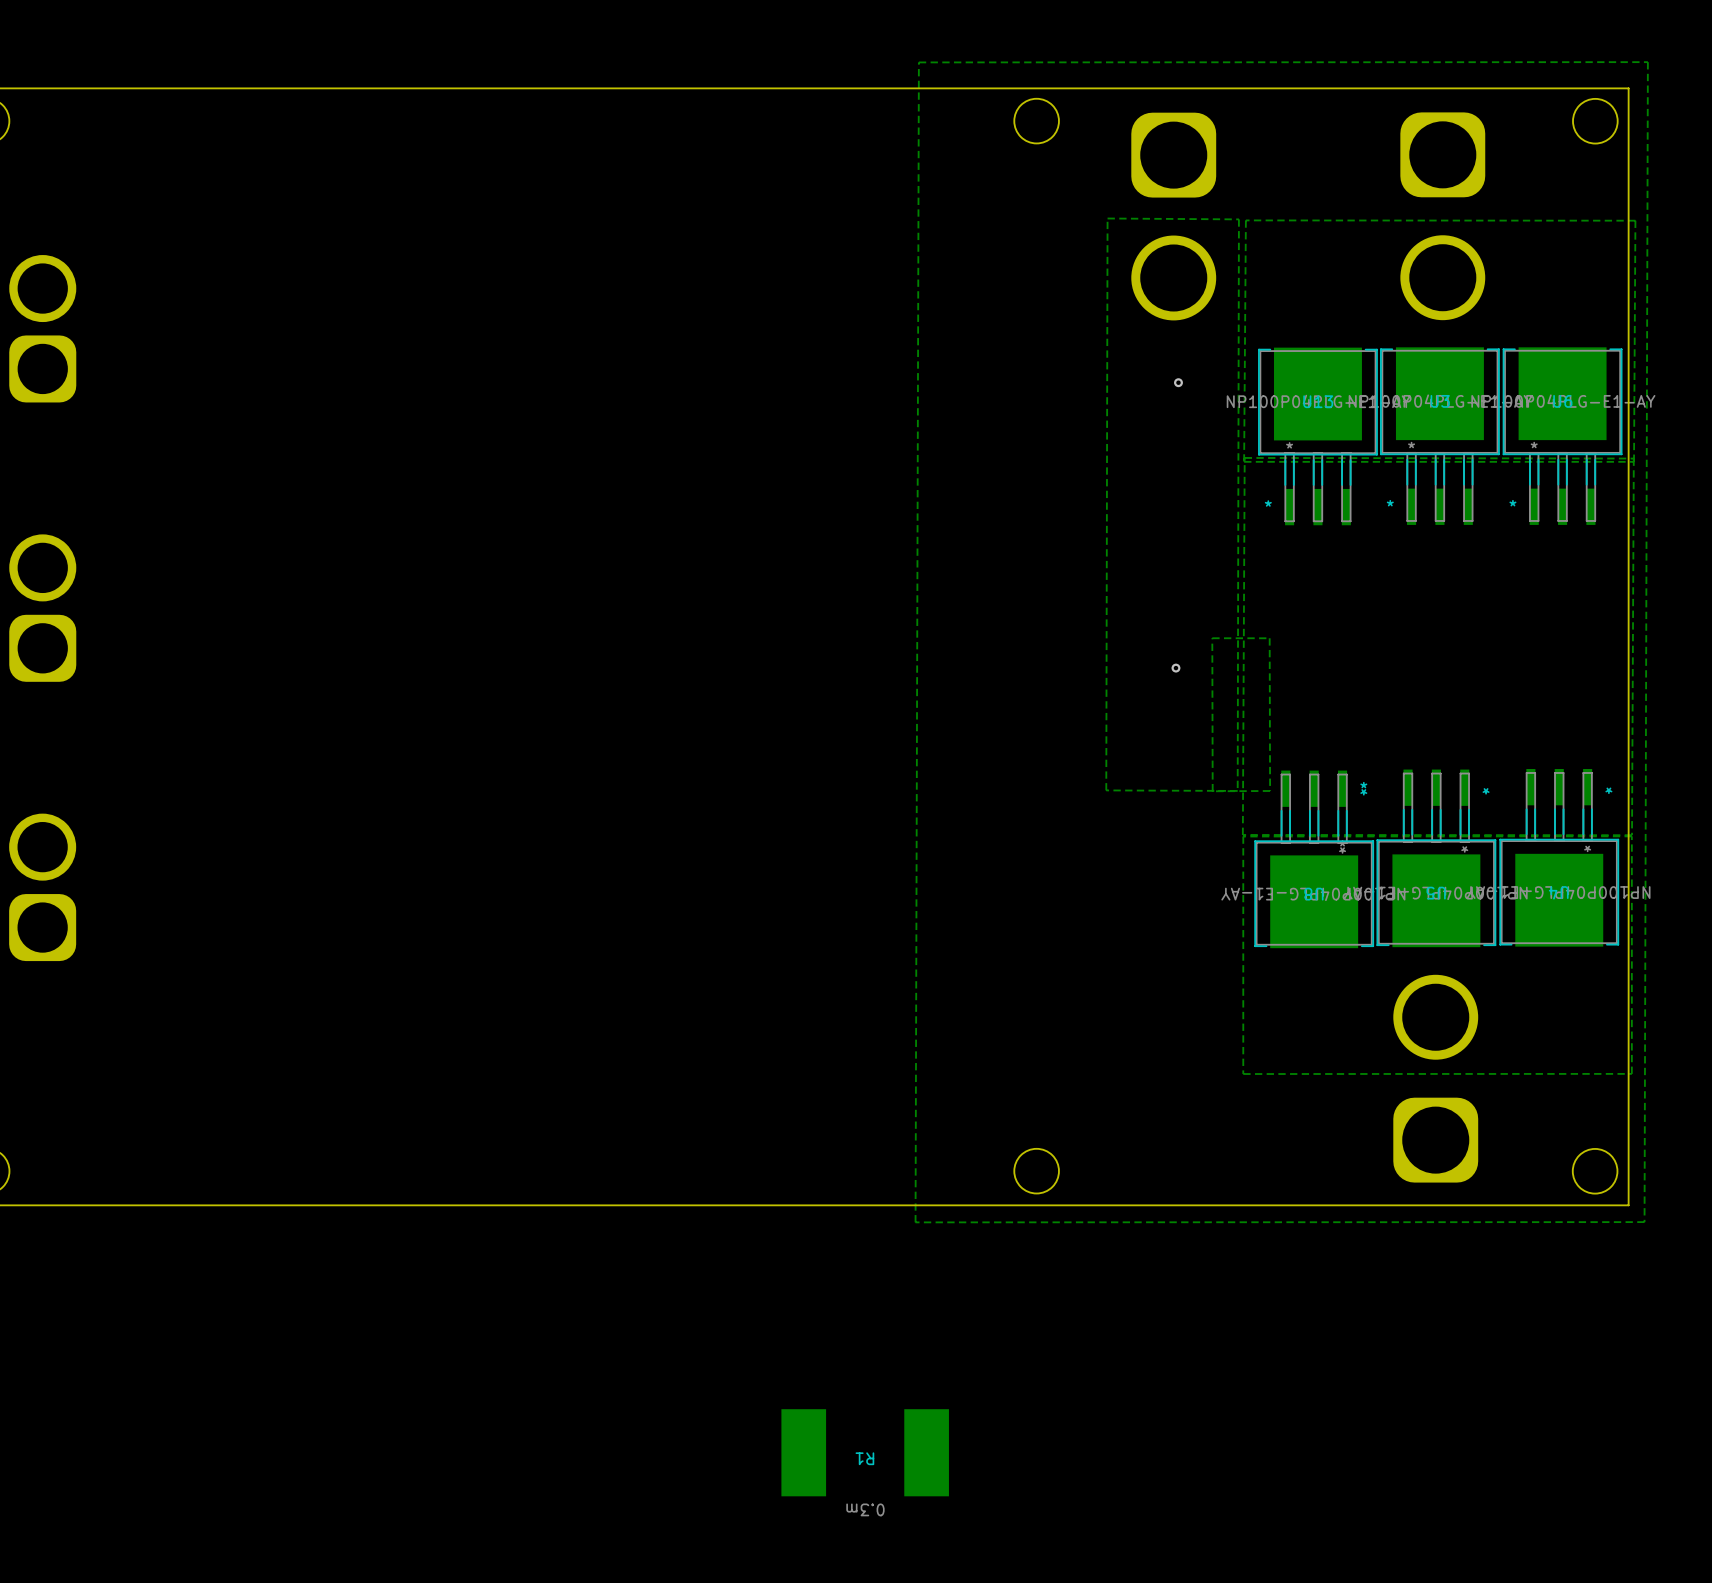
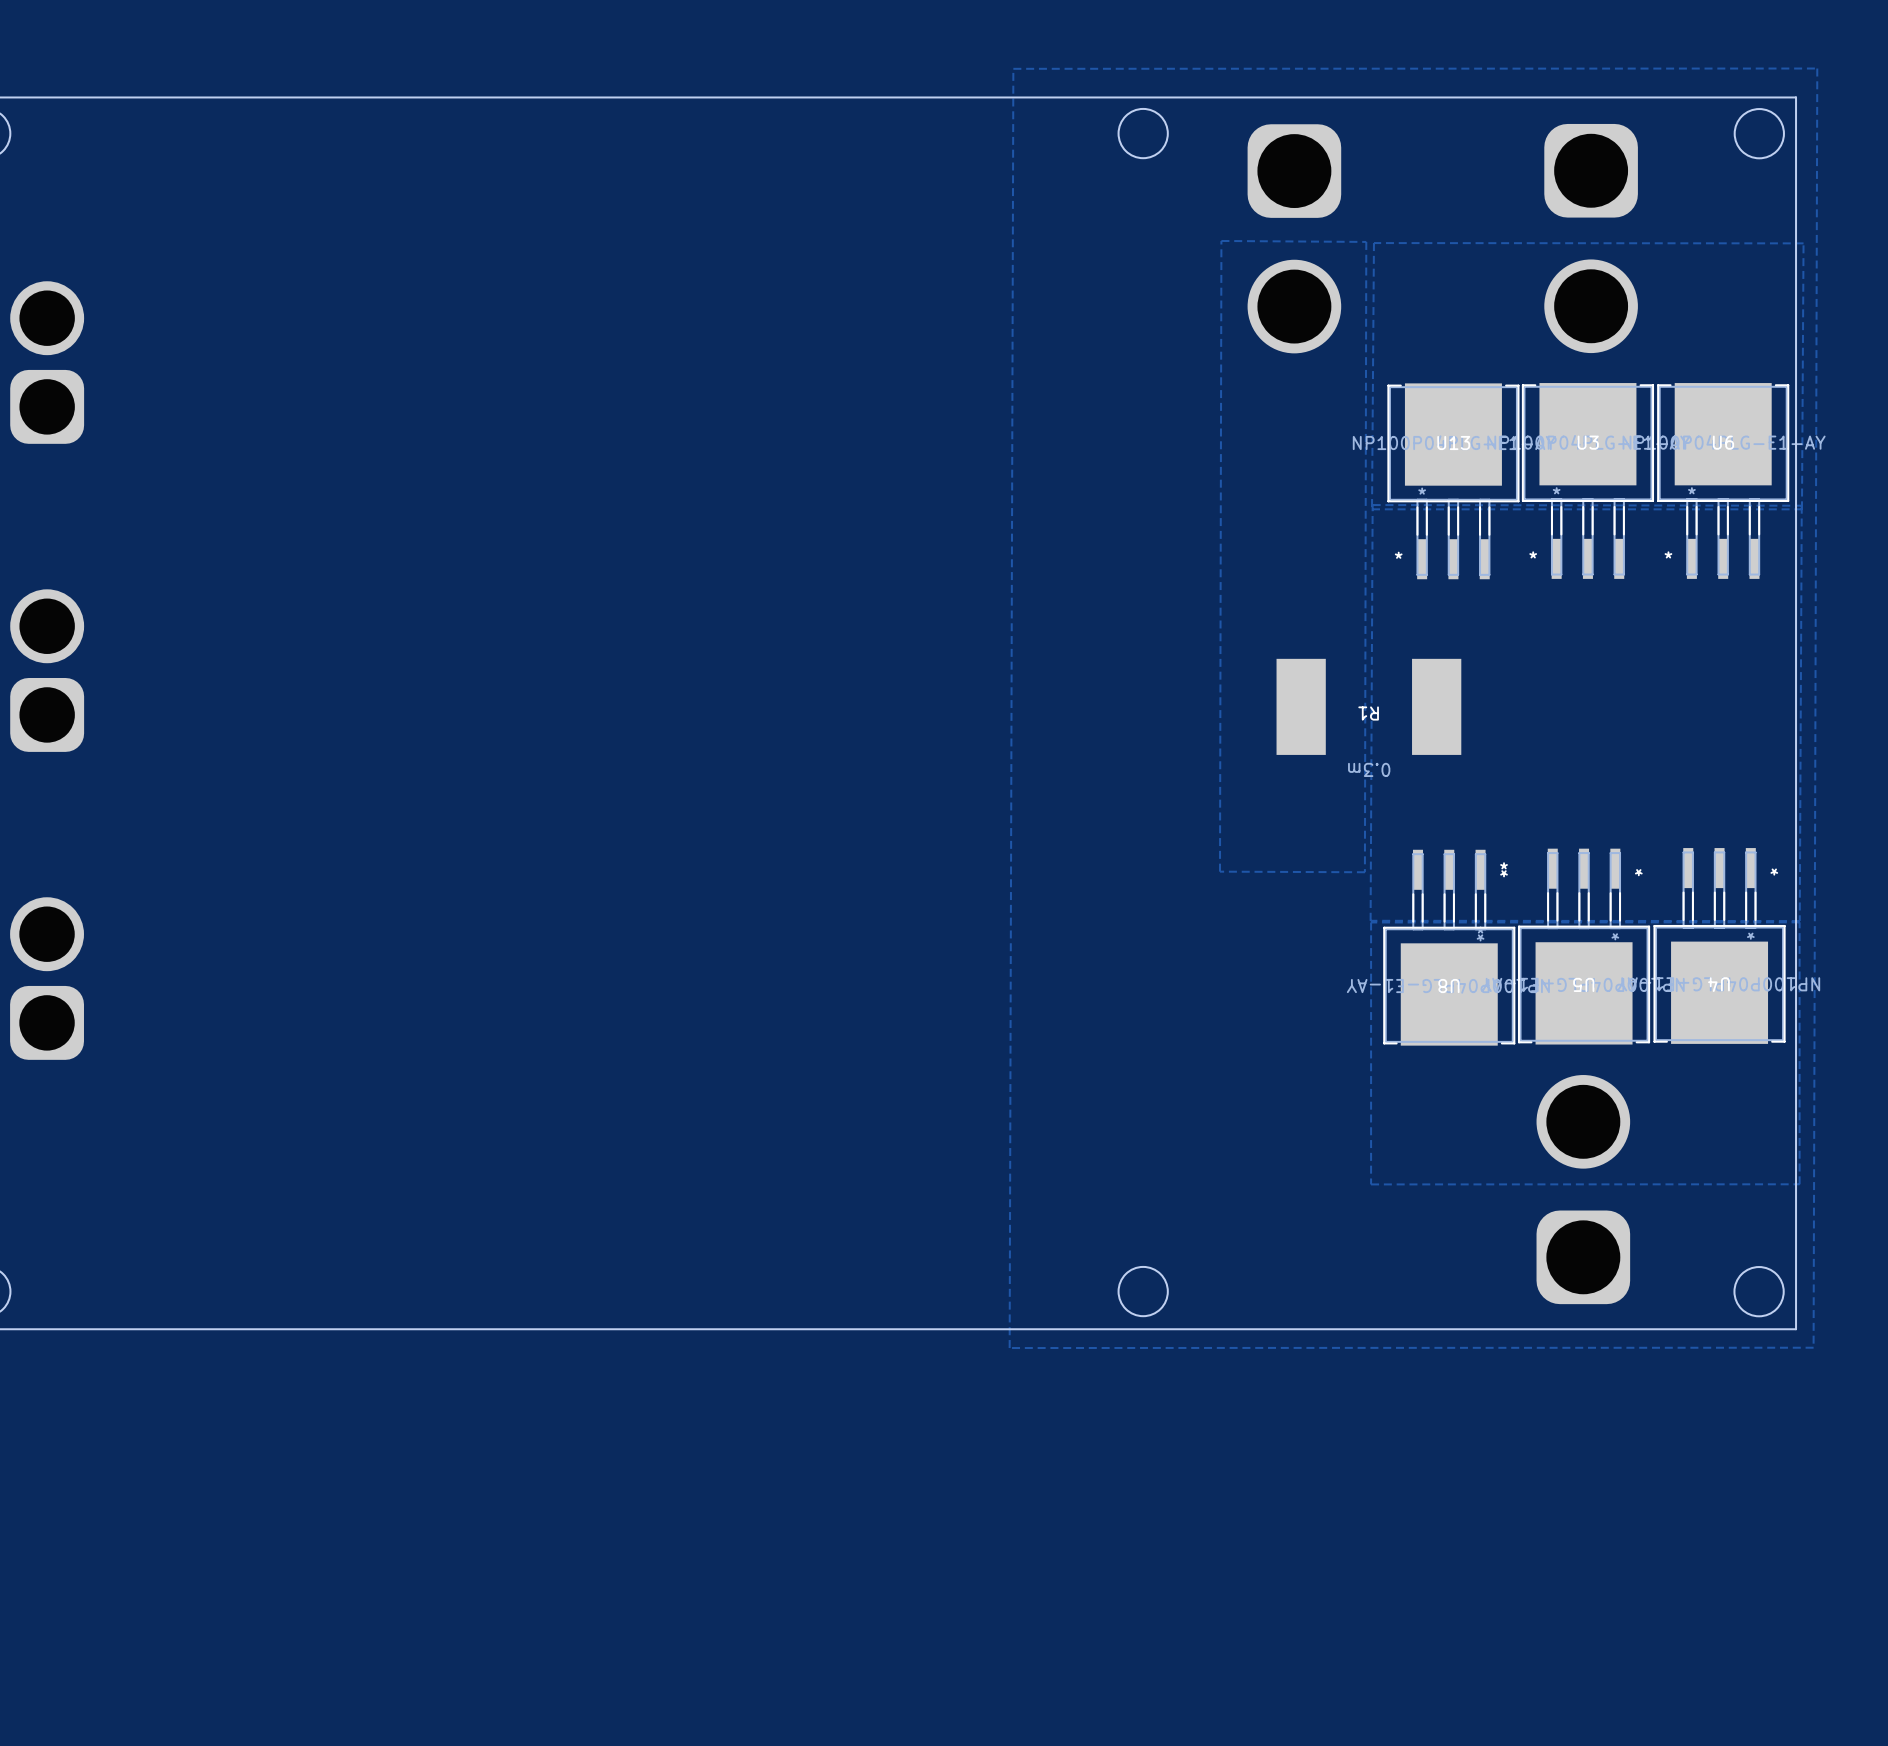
via: (1178, 382) -> none
zone outline: (1269, 638) (1270, 790) (1212, 791) (1212, 638) (1269, 638) -> none
via: (1175, 668) -> none
R1 position: (865, 1452) -> (1368, 706)

